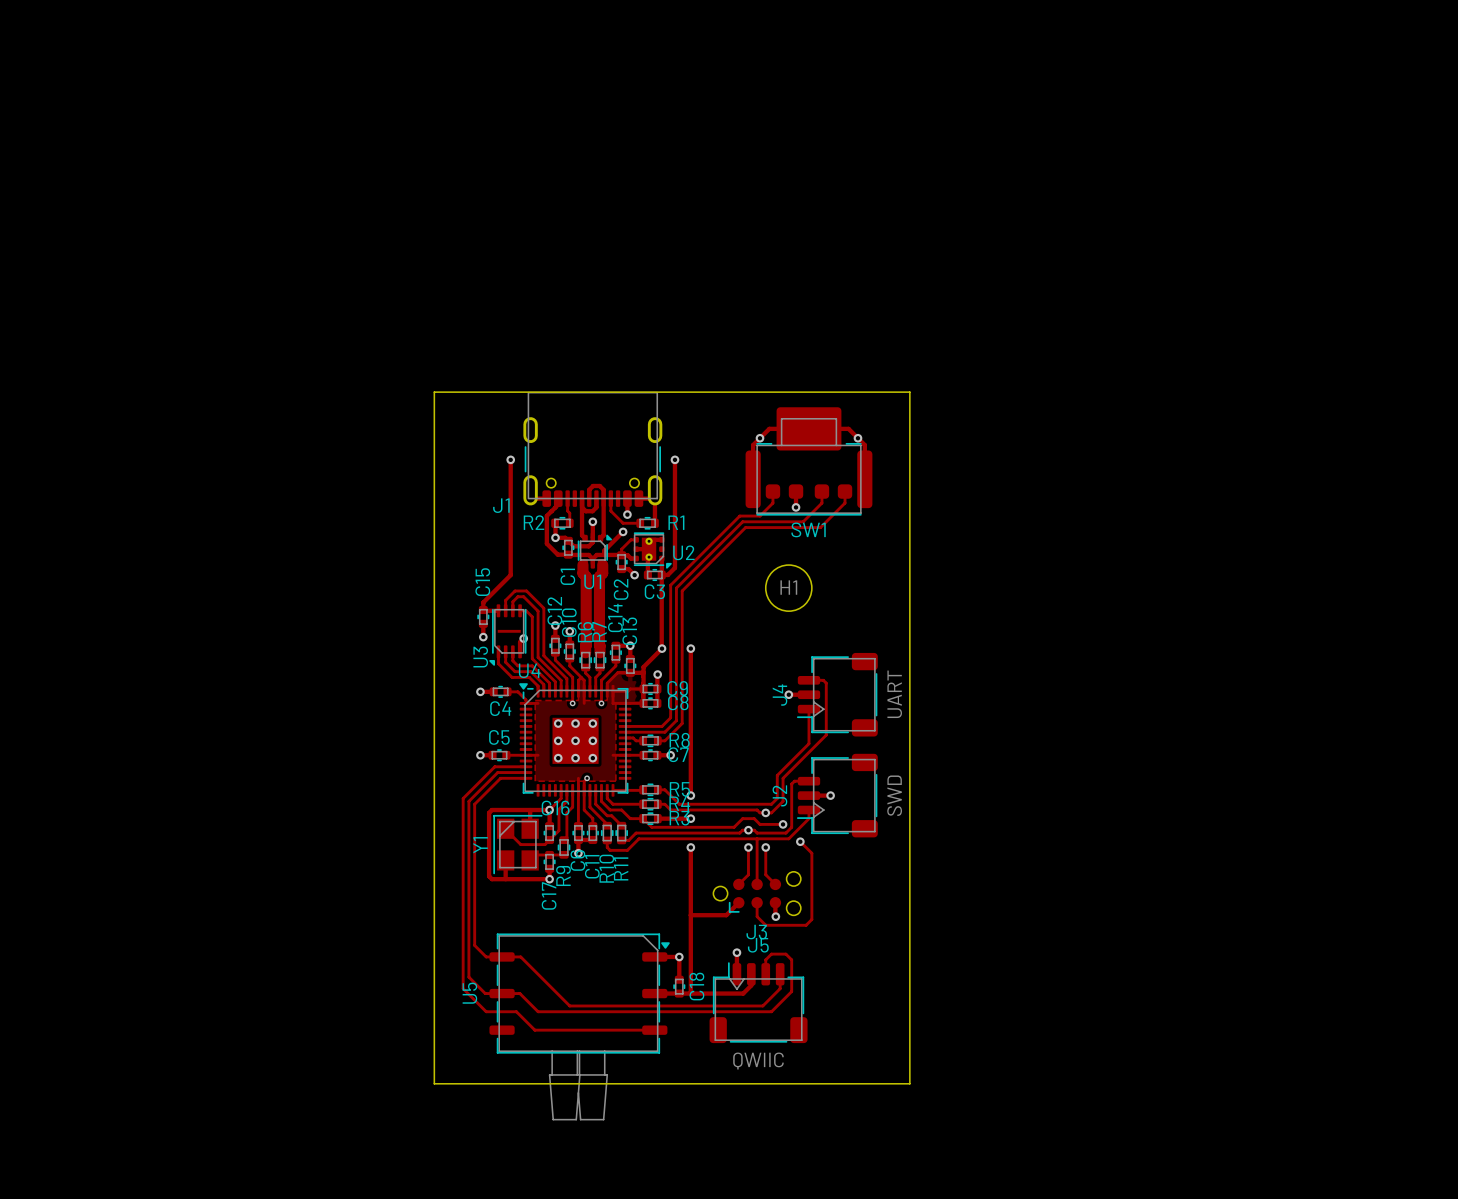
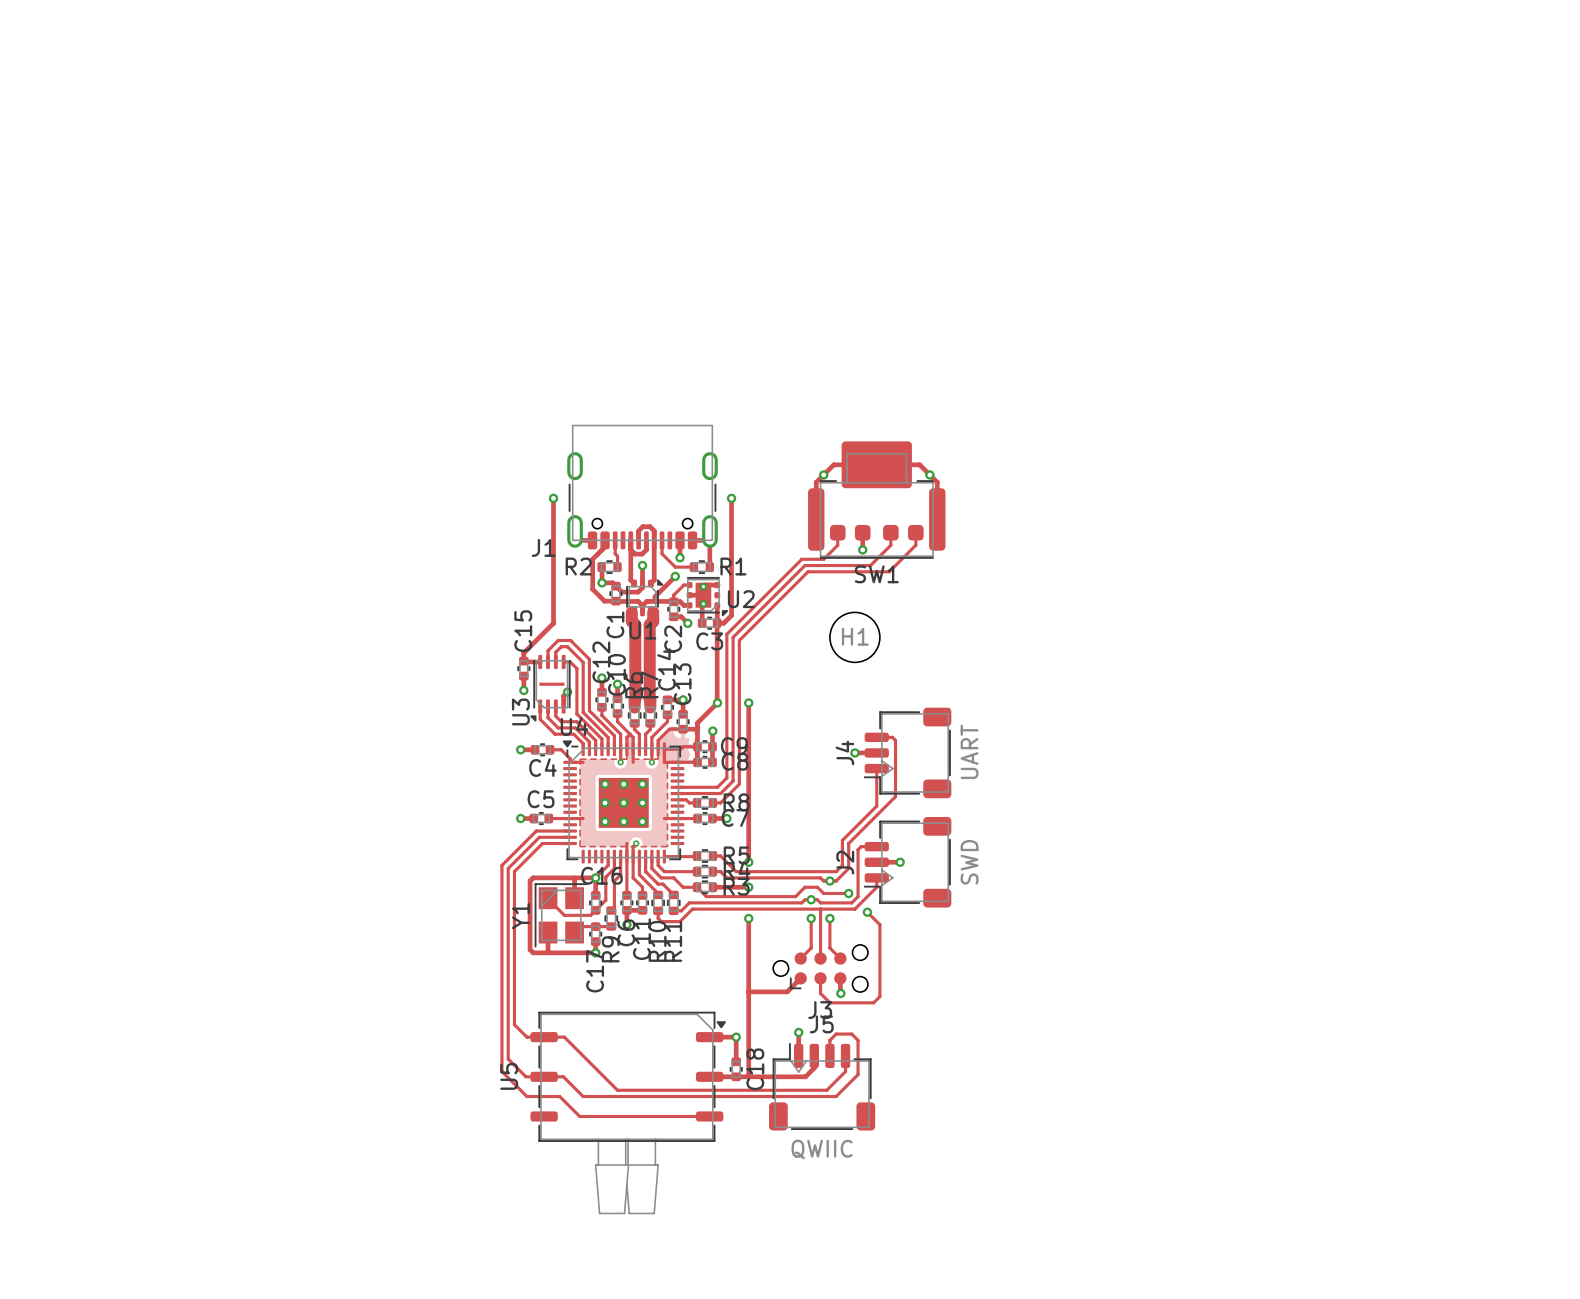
board edge: (434, 392) (909, 392) (909, 1083) (434, 1083) (434, 392) -> none

